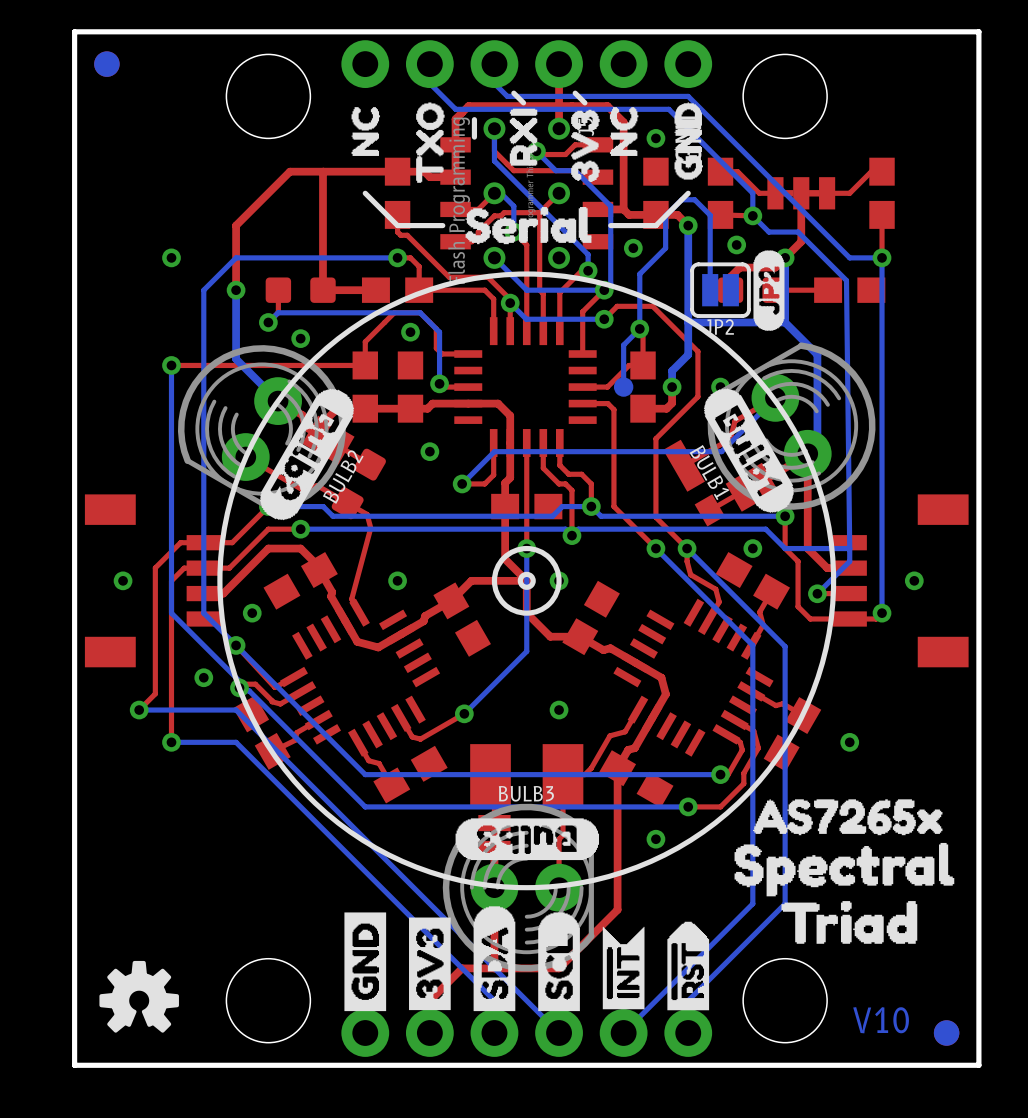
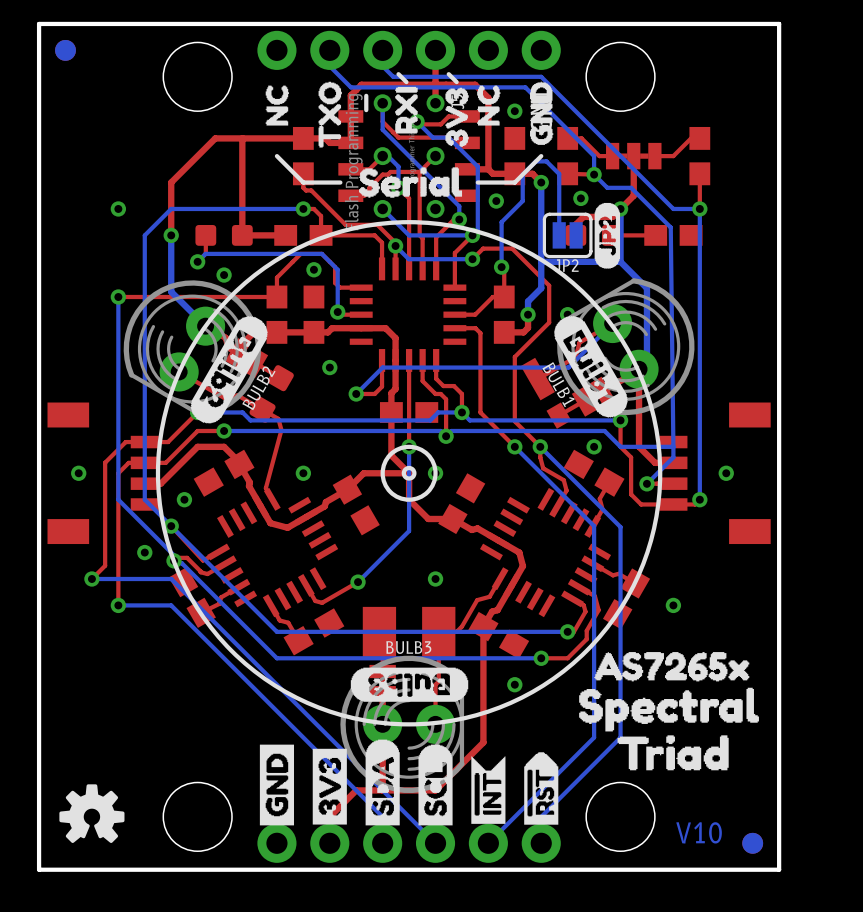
bottom track: (639, 328) (623, 345) (623, 387) -> none
part: (623, 387) -> none

